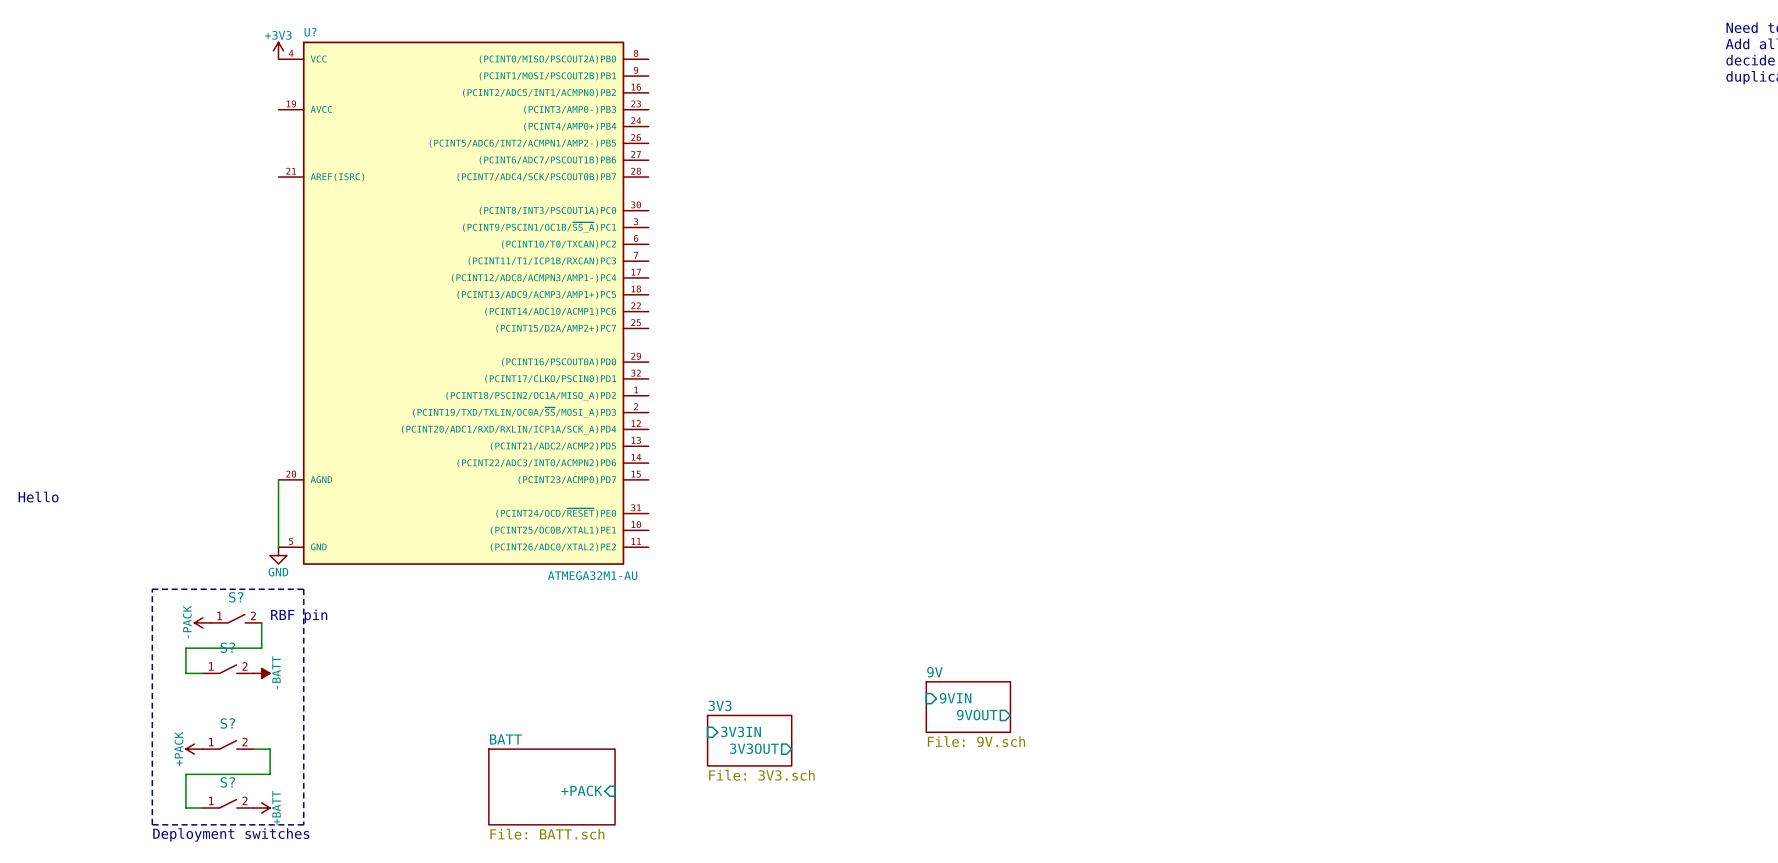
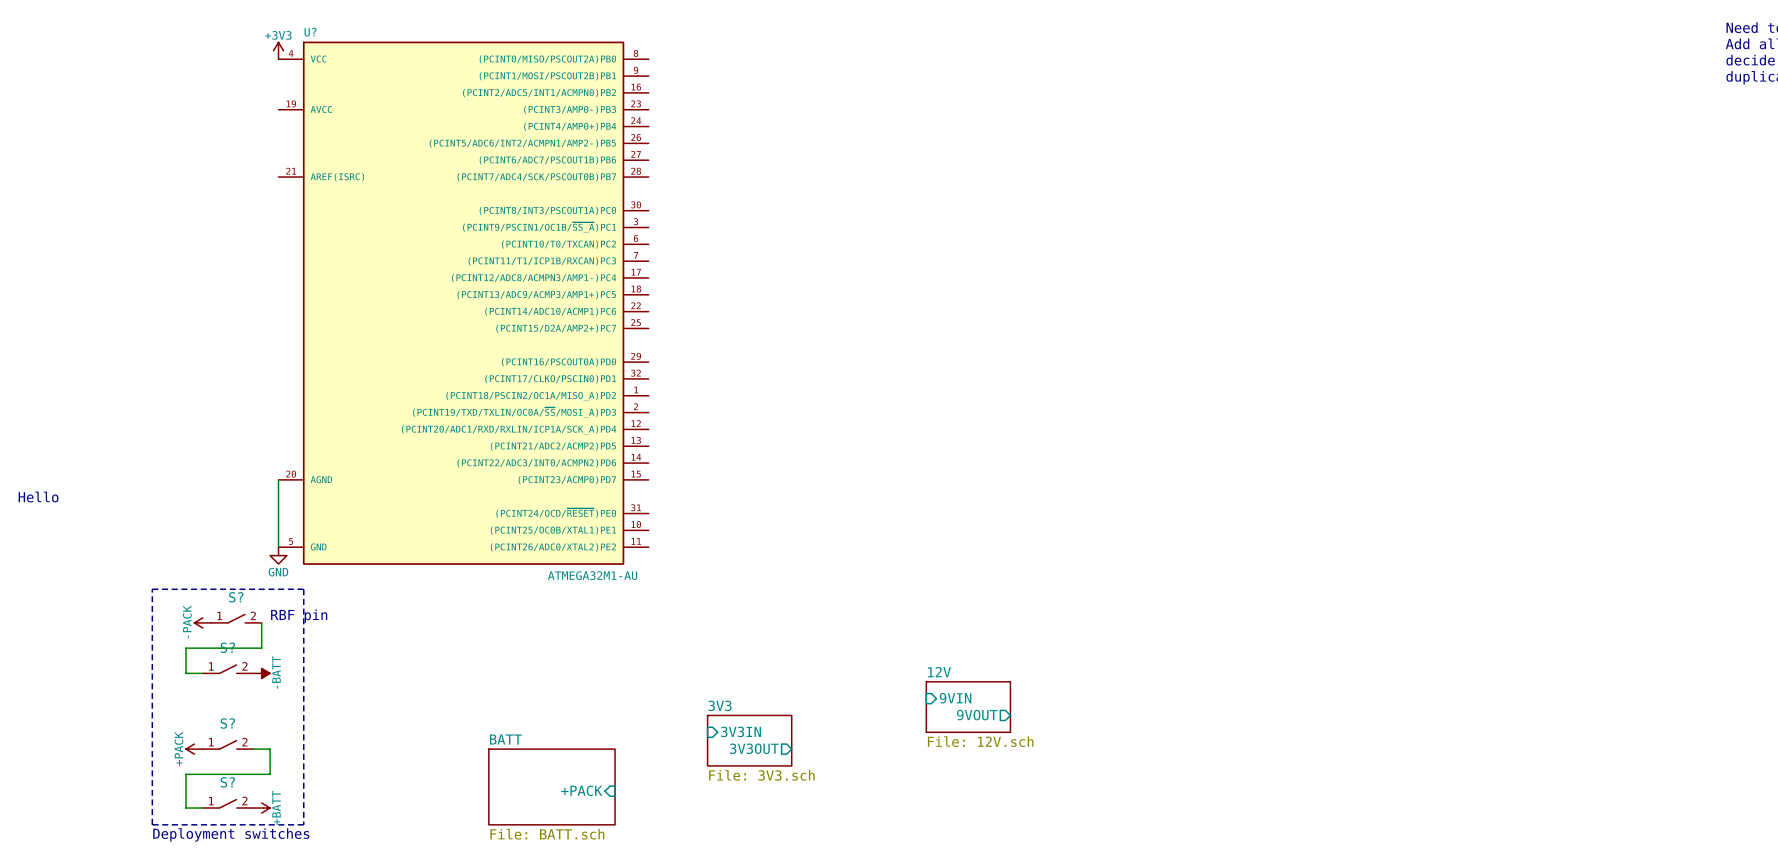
sheet 9V name: 9V (934, 672) -> 12V (939, 672)
sheet 9V value: File: 9V.sch (976, 741) -> File: 12V.sch (980, 741)

